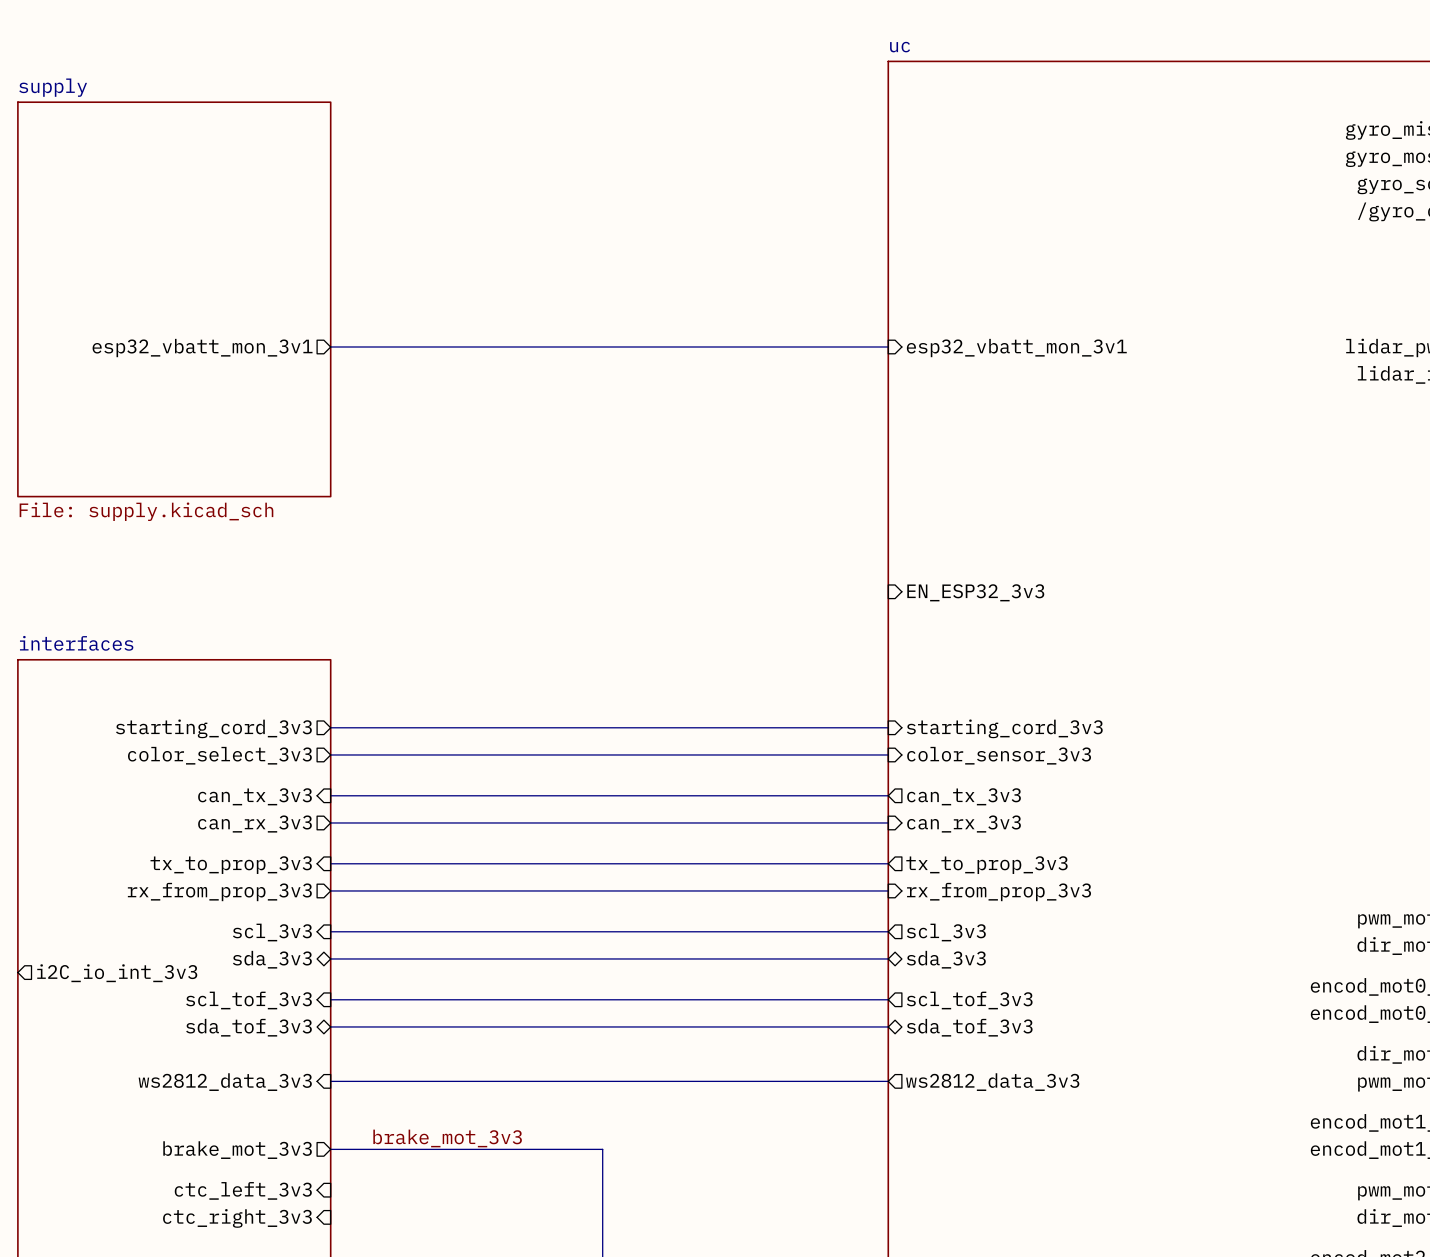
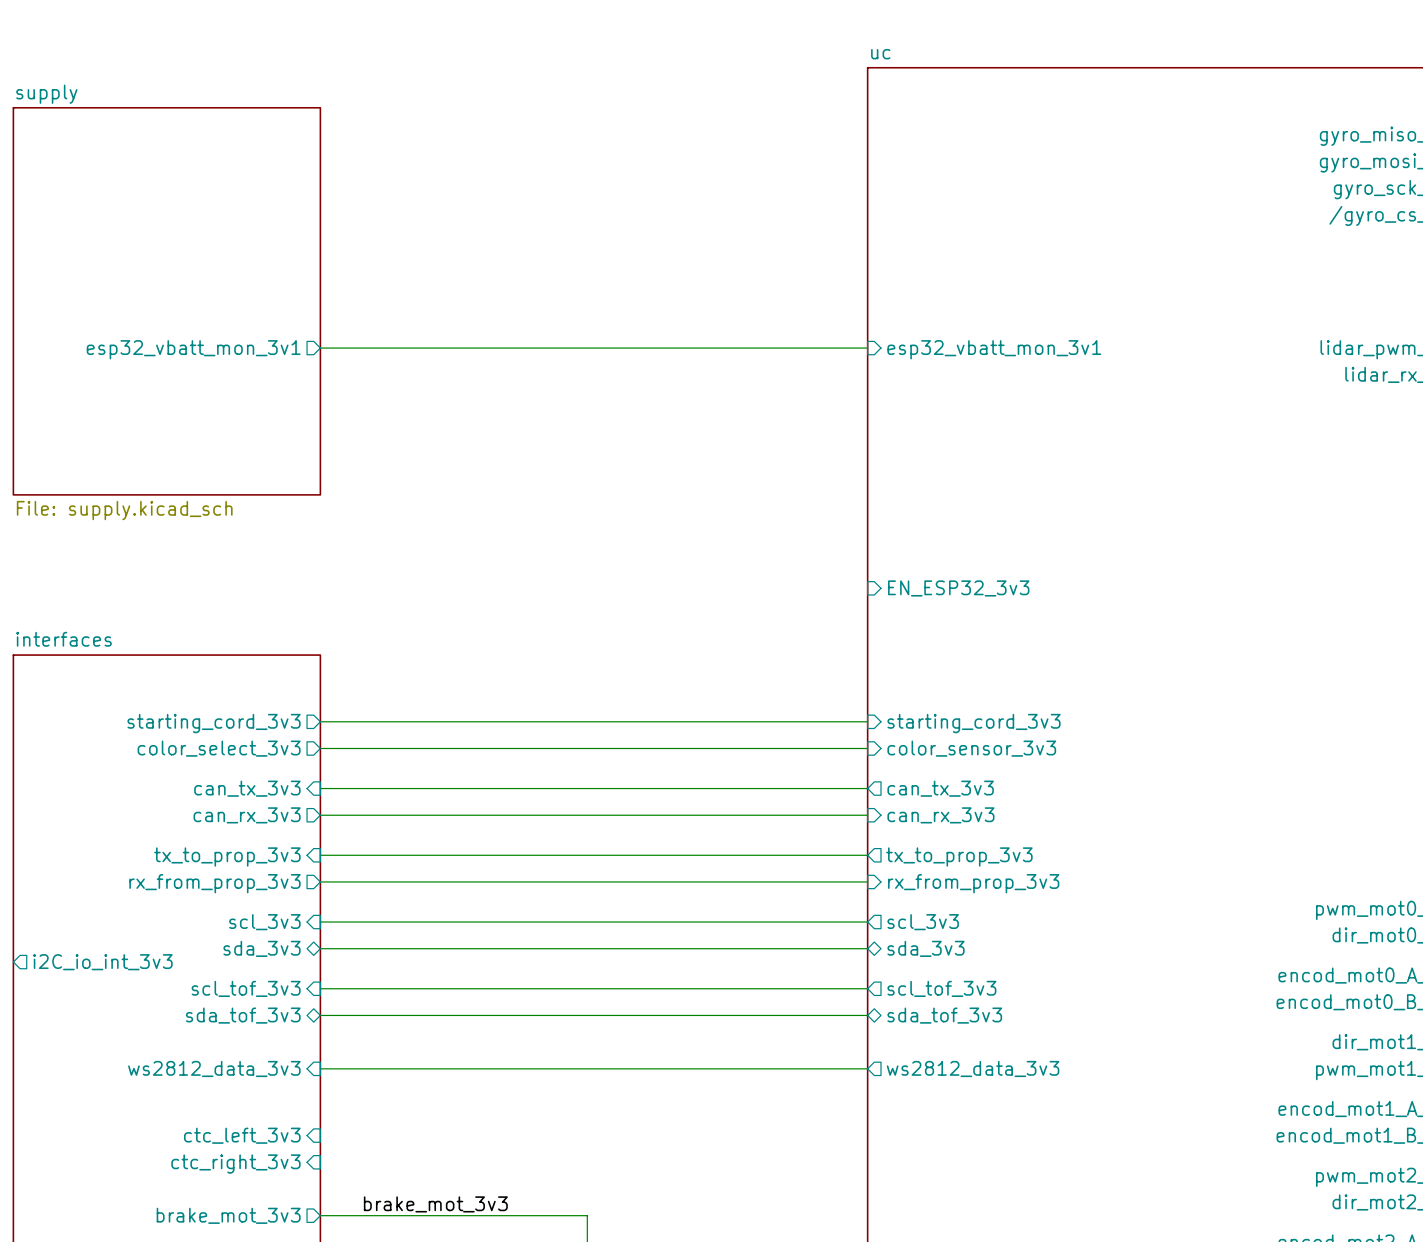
label position: brake_mot_3v3 (447, 1138) -> brake_mot_3v3 (435, 1204)
wire: (330, 1149) (602, 1149) (602, 1230) -> (320, 1215) (587, 1215)
sheet pin shape: output (237, 1150) -> input (242, 1135)
sheet pin: brake_mot_3v3 (237, 1150) -> ctc_left_3v3 (242, 1135)
sheet pin: ctc_left_3v3 (243, 1190) -> none
sheet pin position: ctc_right_3v3 (237, 1218) -> ctc_right_3v3 (235, 1164)
sheet pin: none -> brake_mot_3v3 (228, 1215)

